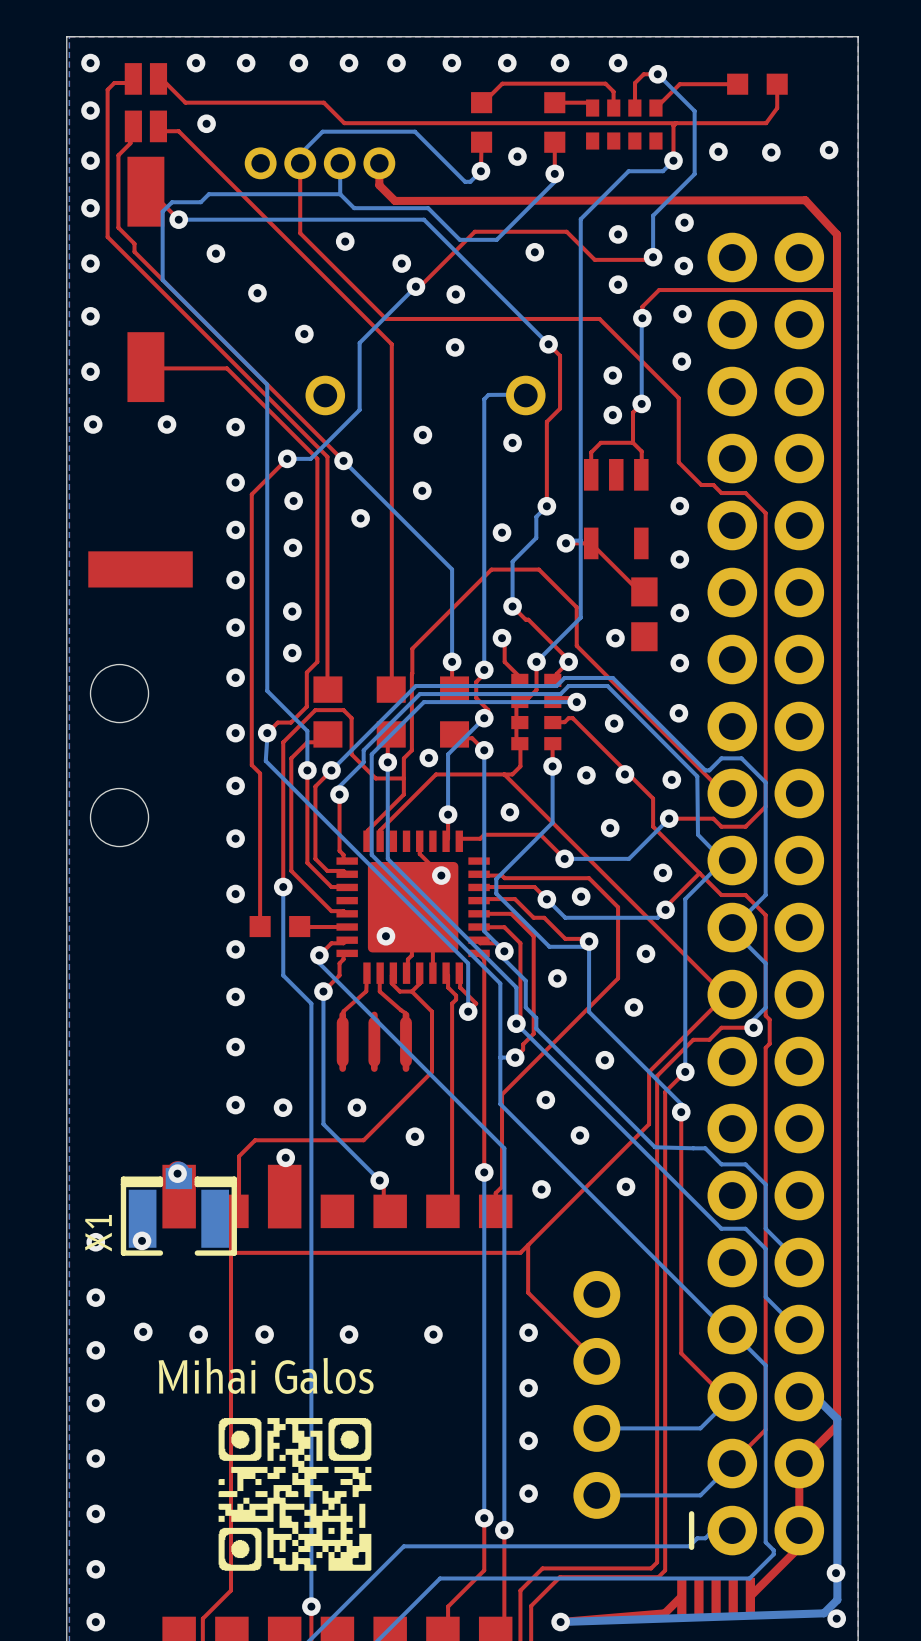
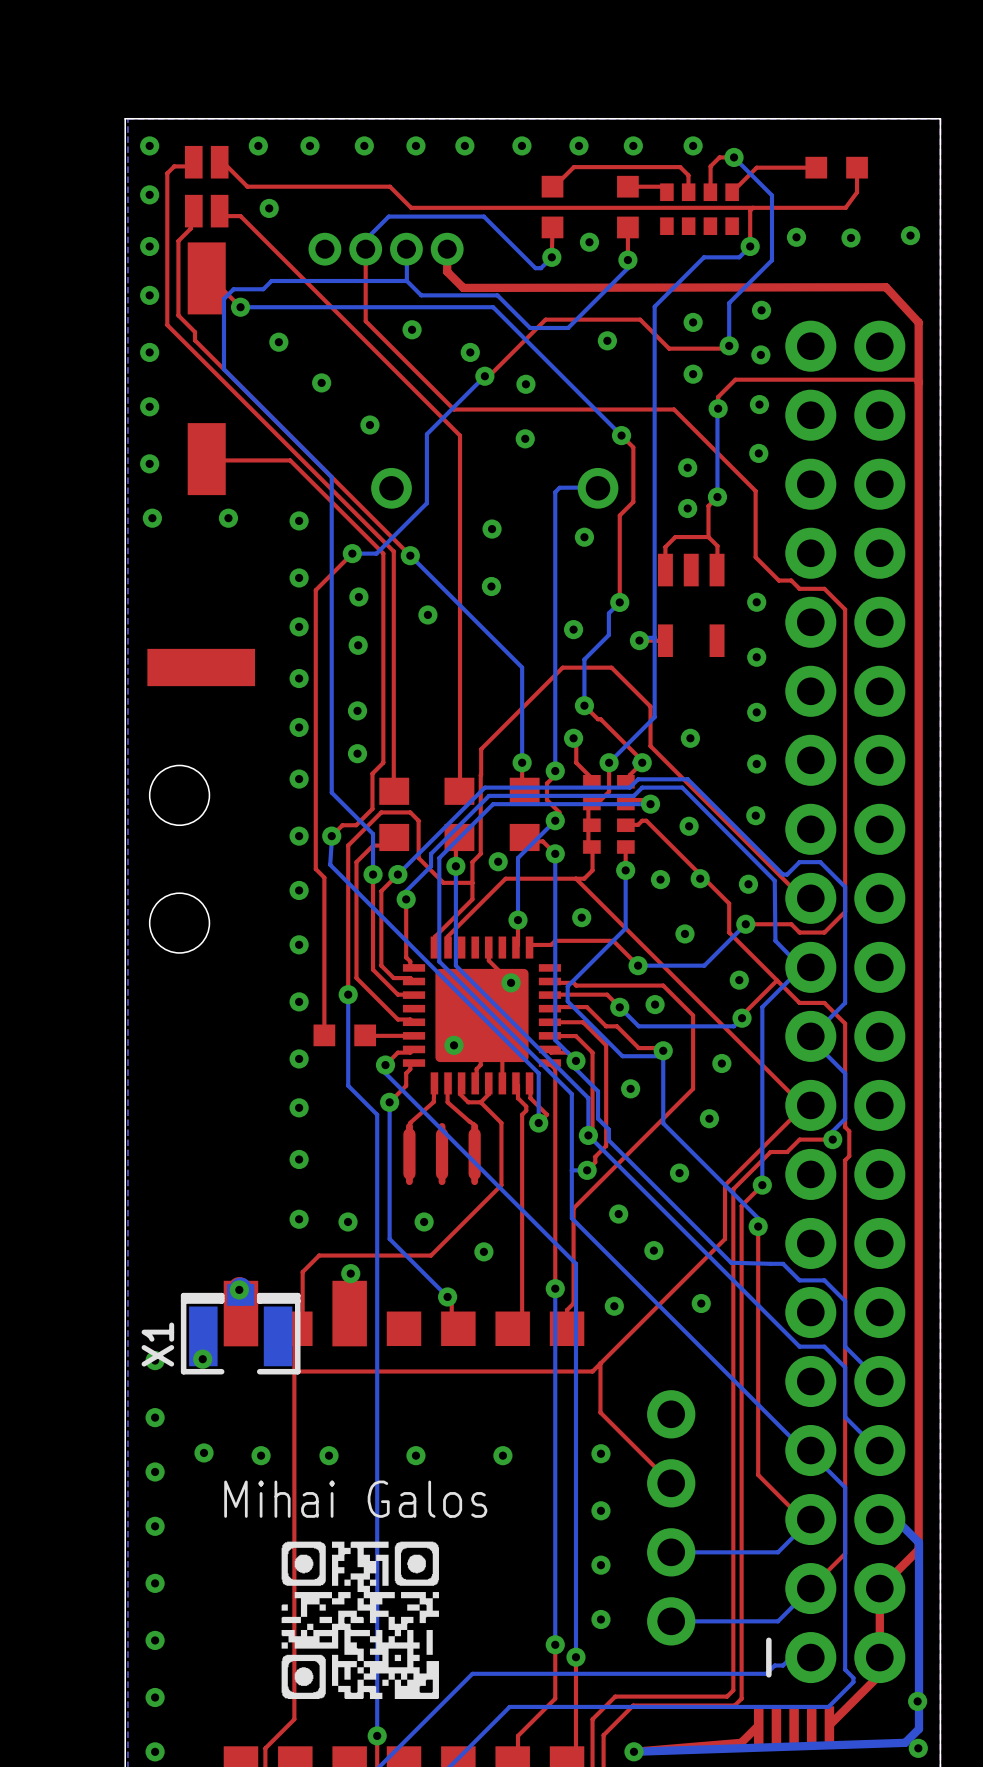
top track: (591, 543) (639, 591) (644, 591) -> none
part: (644, 614) -> none

